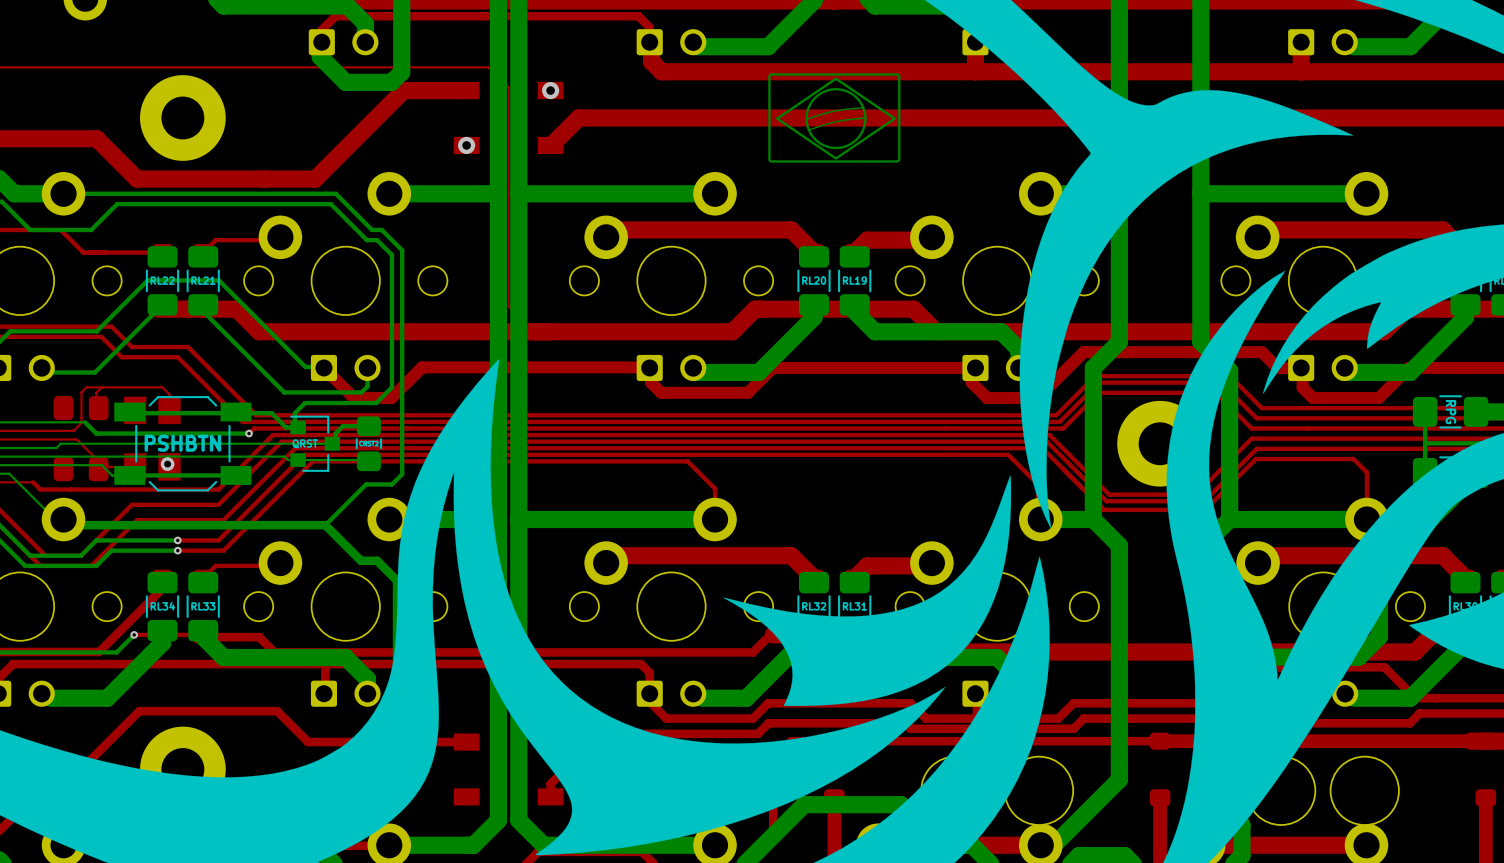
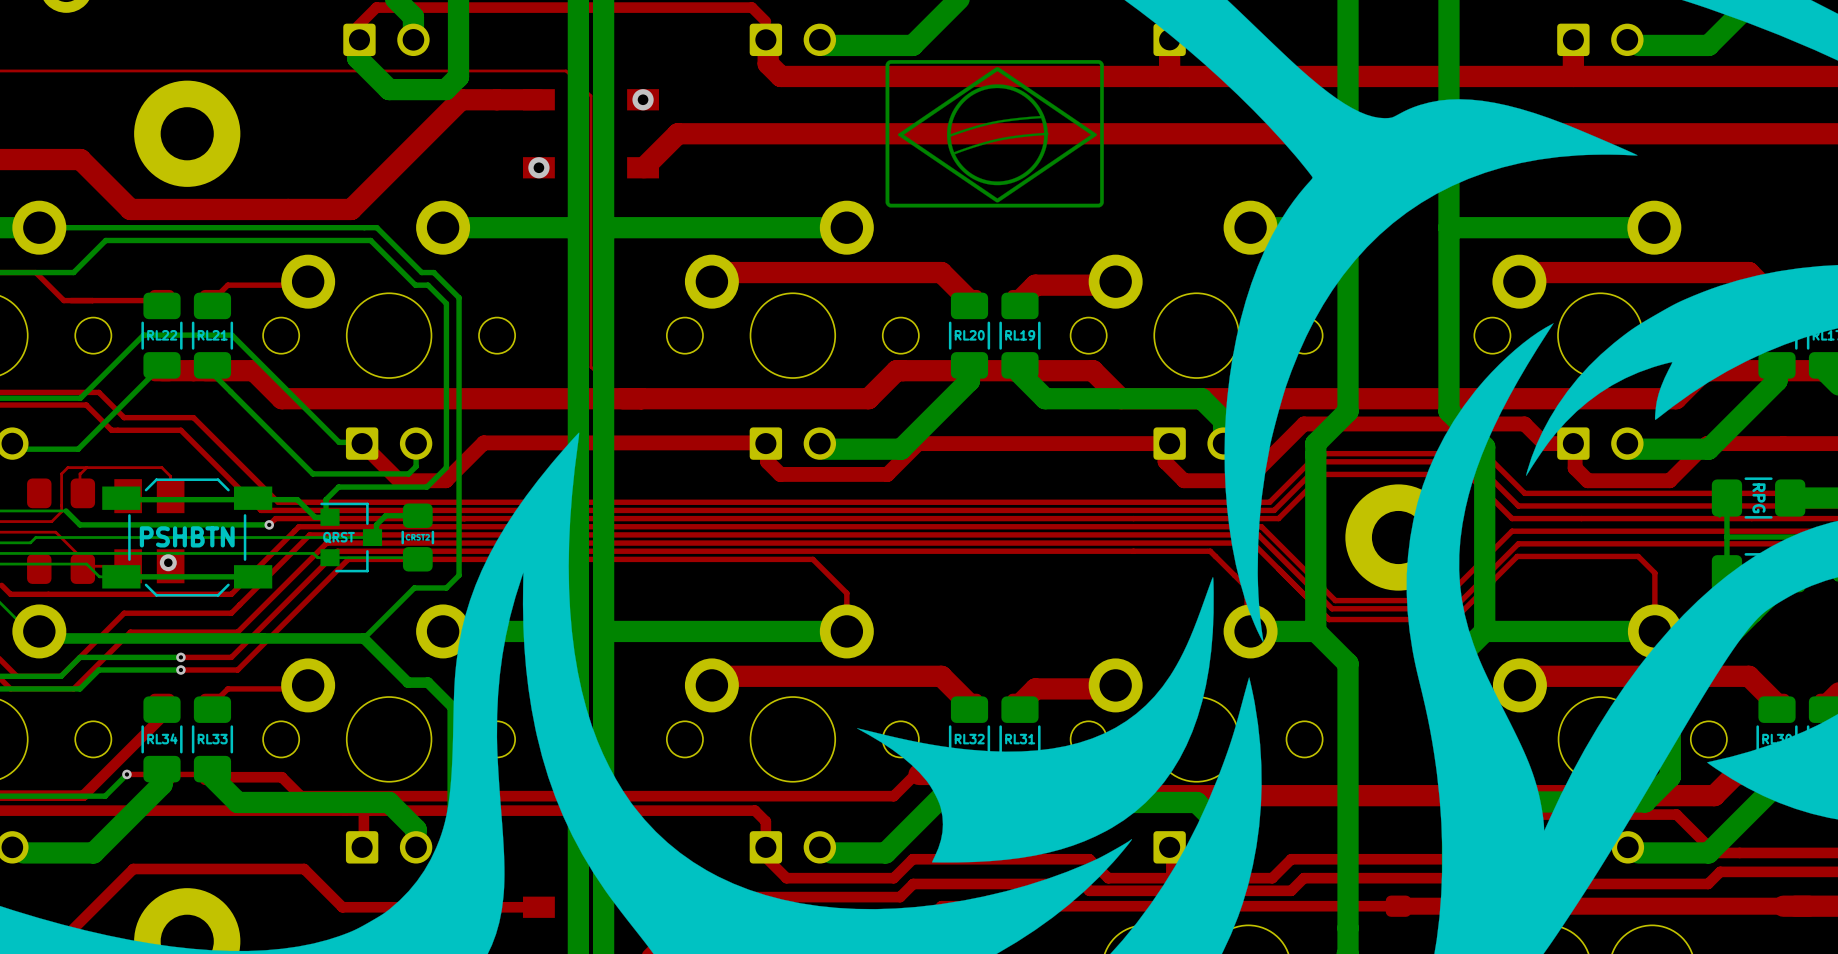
part footprint: [768, 73, 901, 163] -> [885, 59, 1104, 208]

